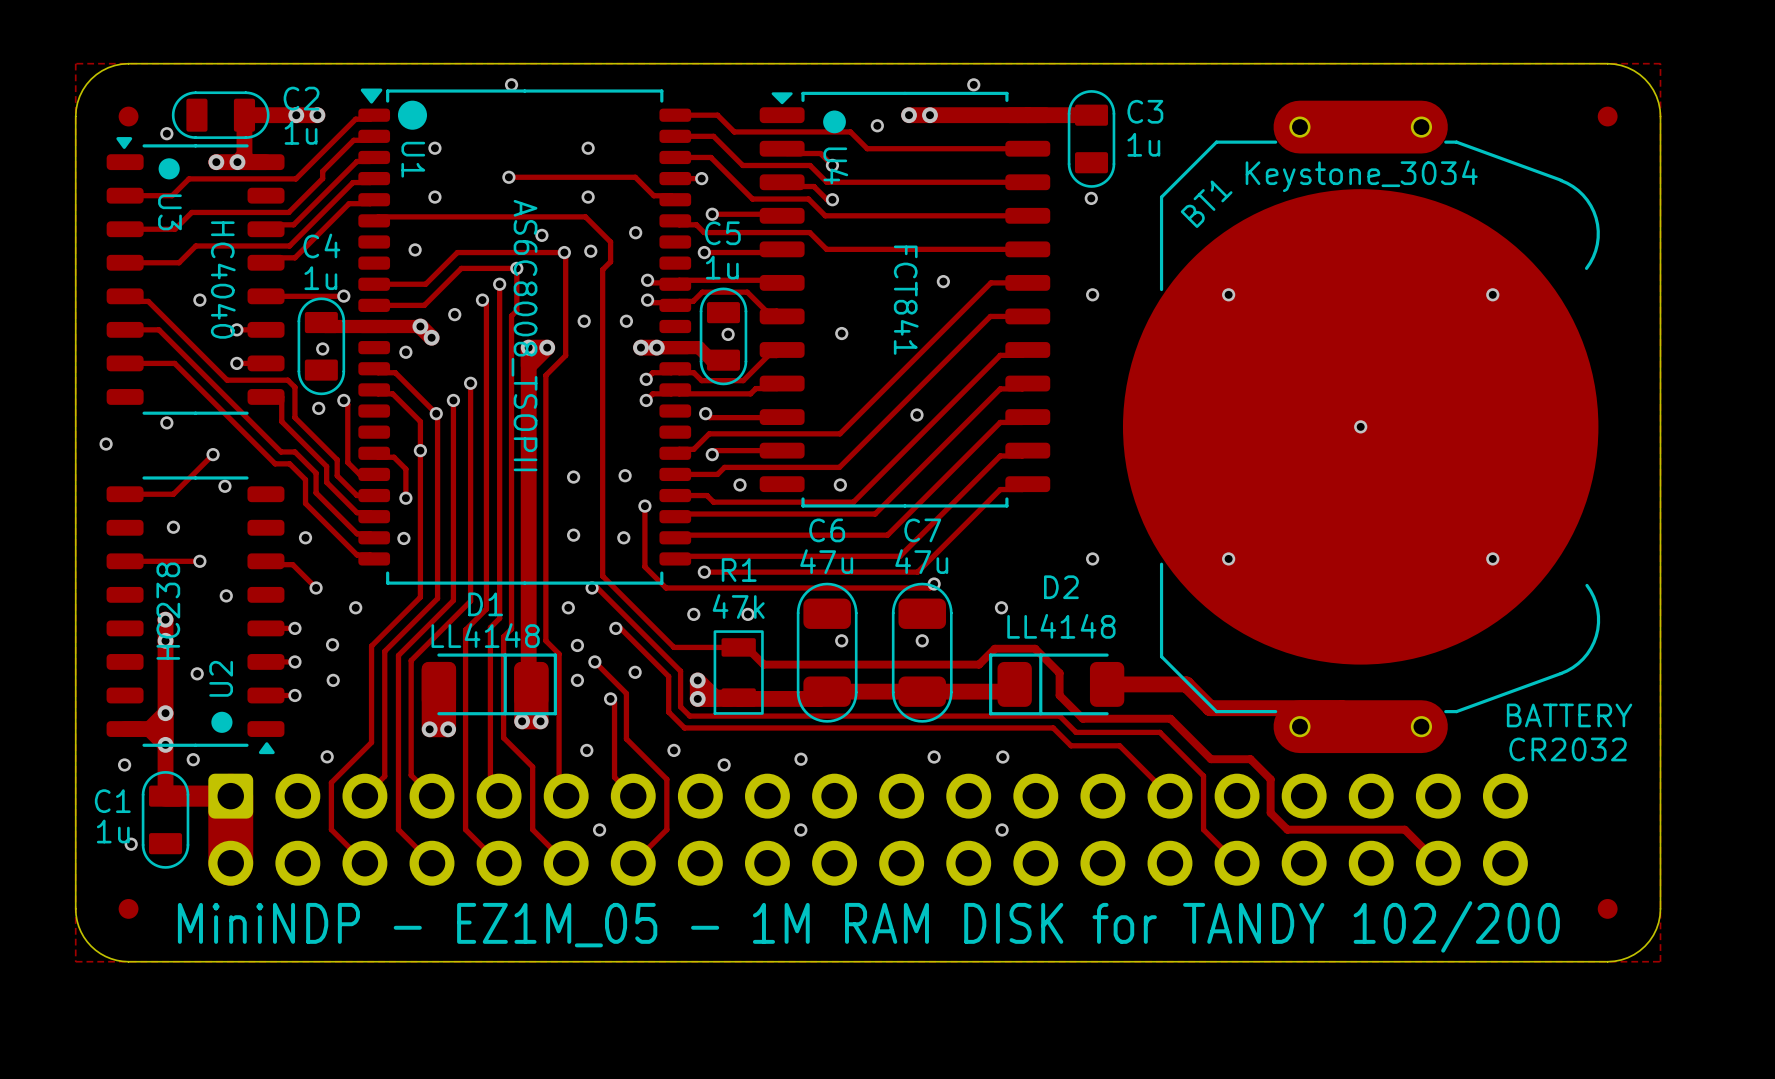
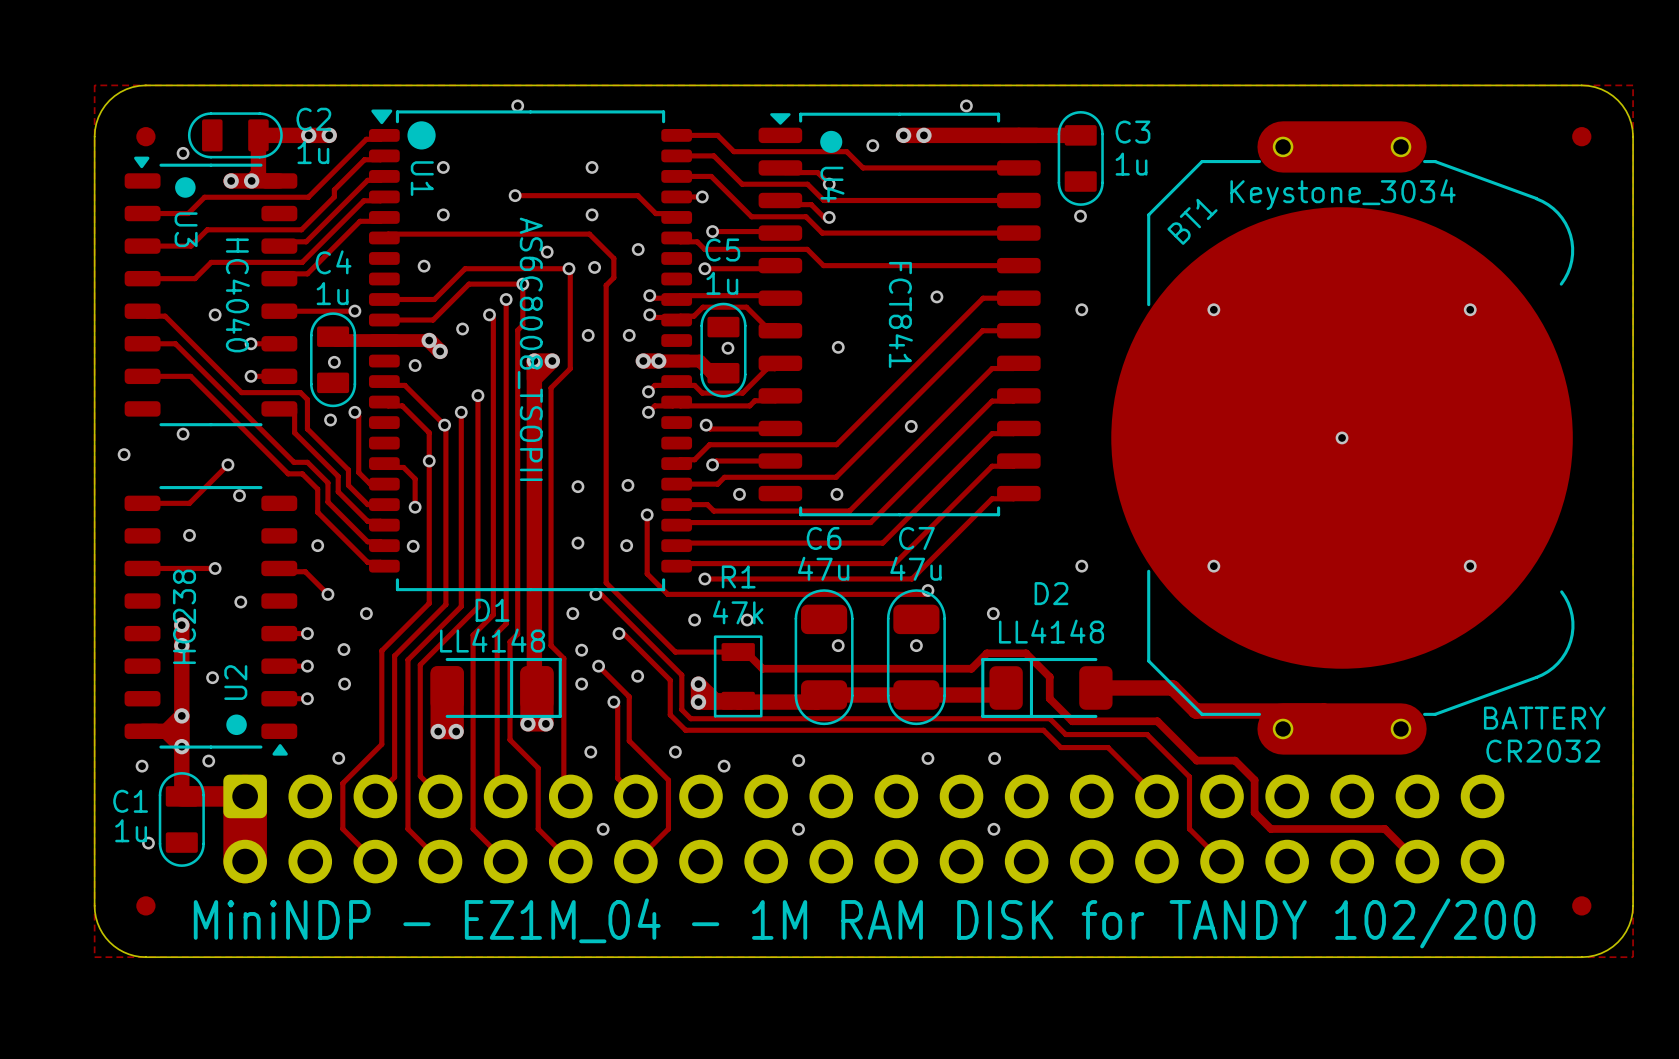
text: MiniNDP - EZ1M_05 - 1M RAM DISK for TANDY 102/200 (868, 926) -> MiniNDP - EZ1M_04 - 1M RAM DISK for TANDY 102/200 (864, 923)

